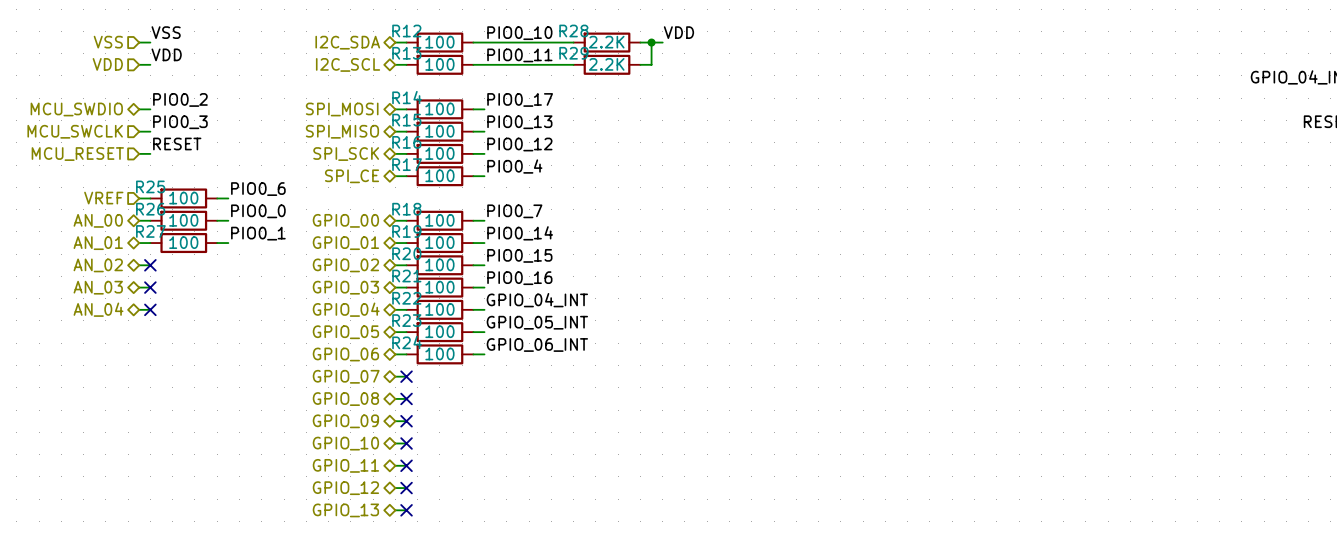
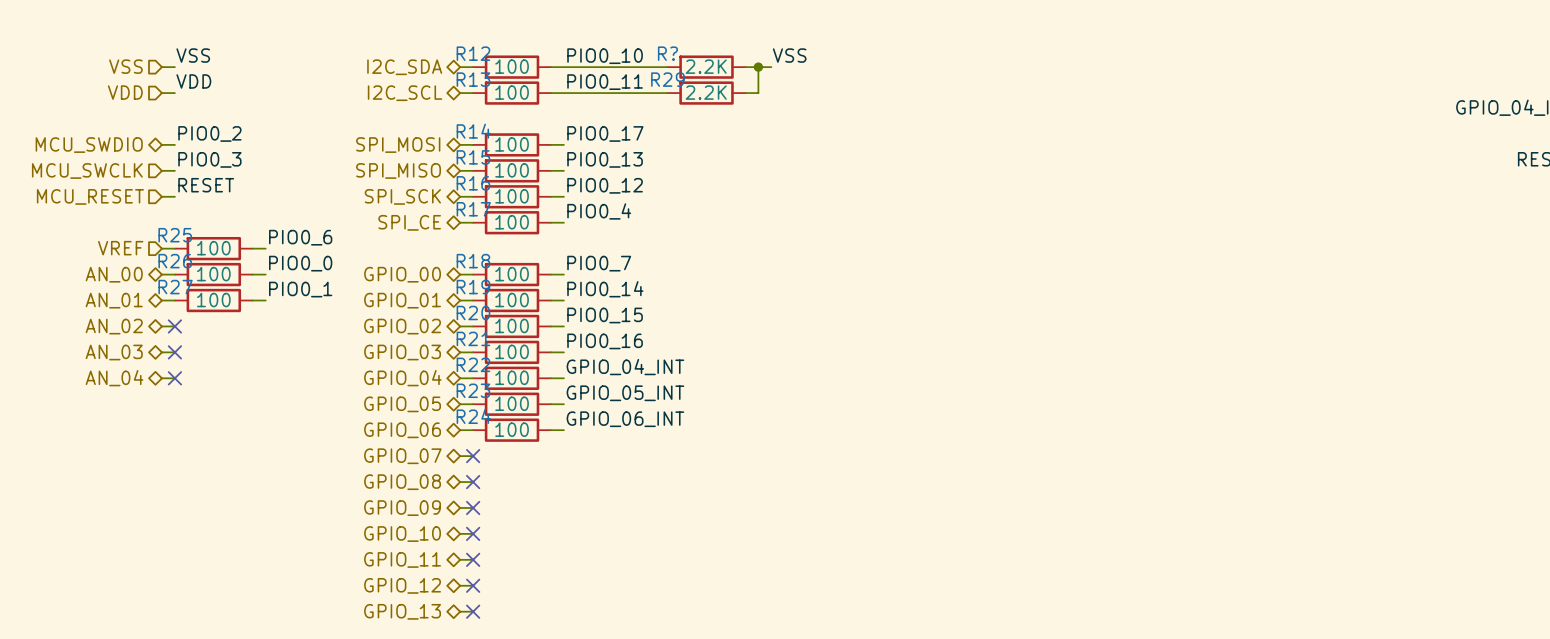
R28 name: R28 (573, 31) -> R? (667, 53)
label: VDD (678, 32) -> VSS (789, 55)

